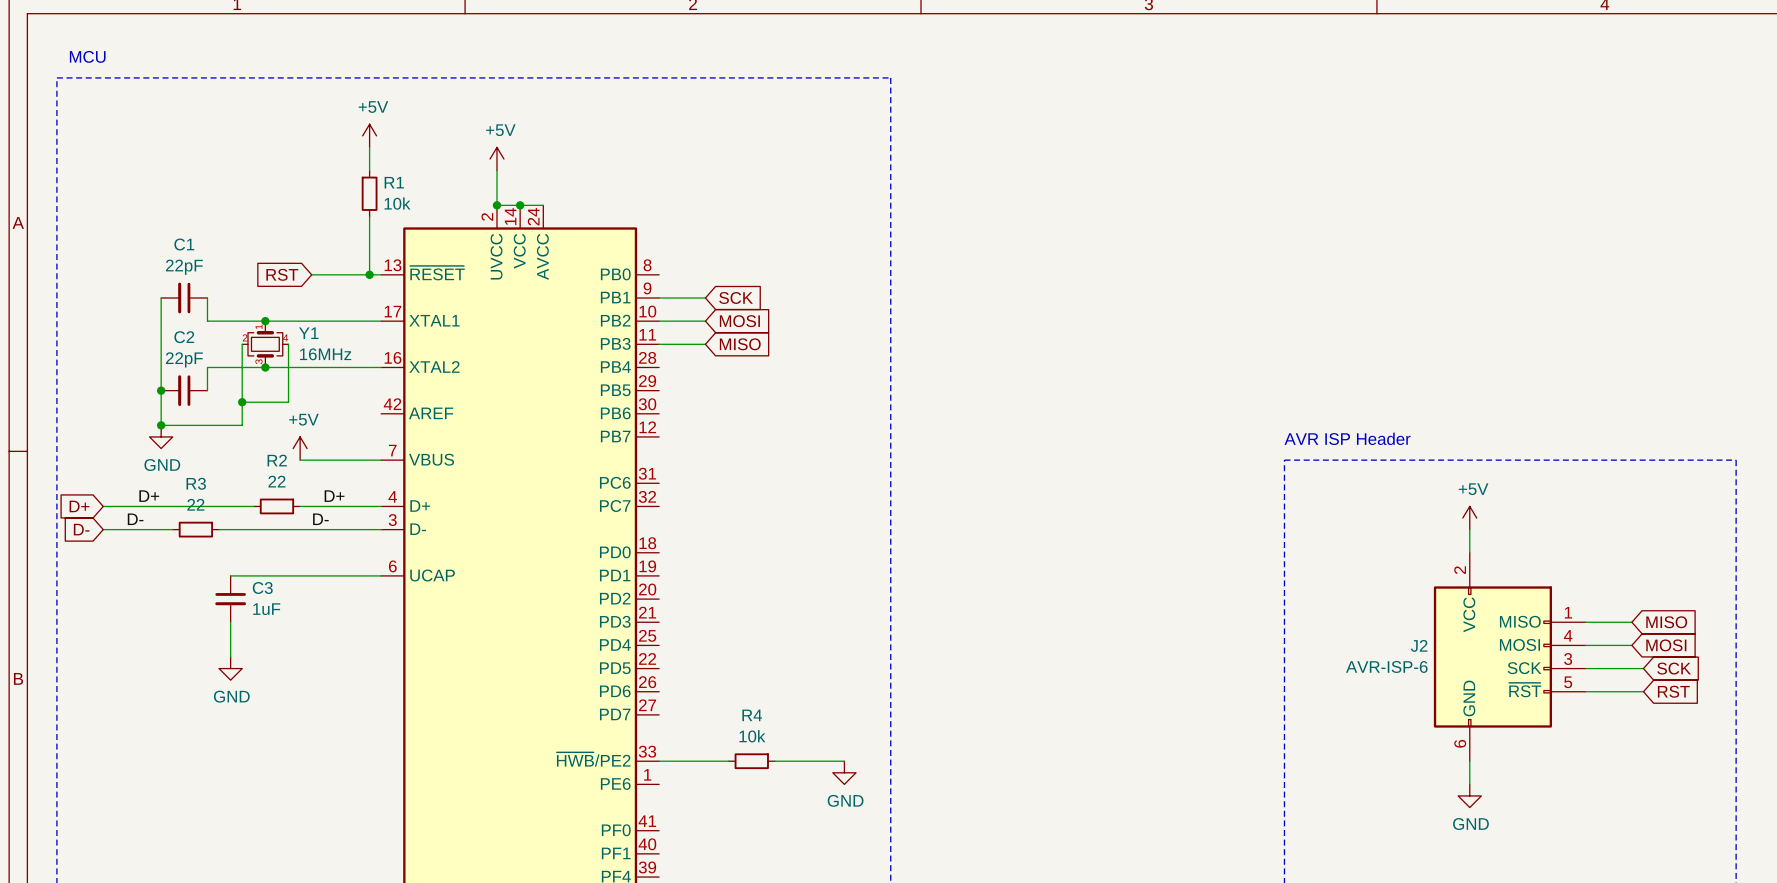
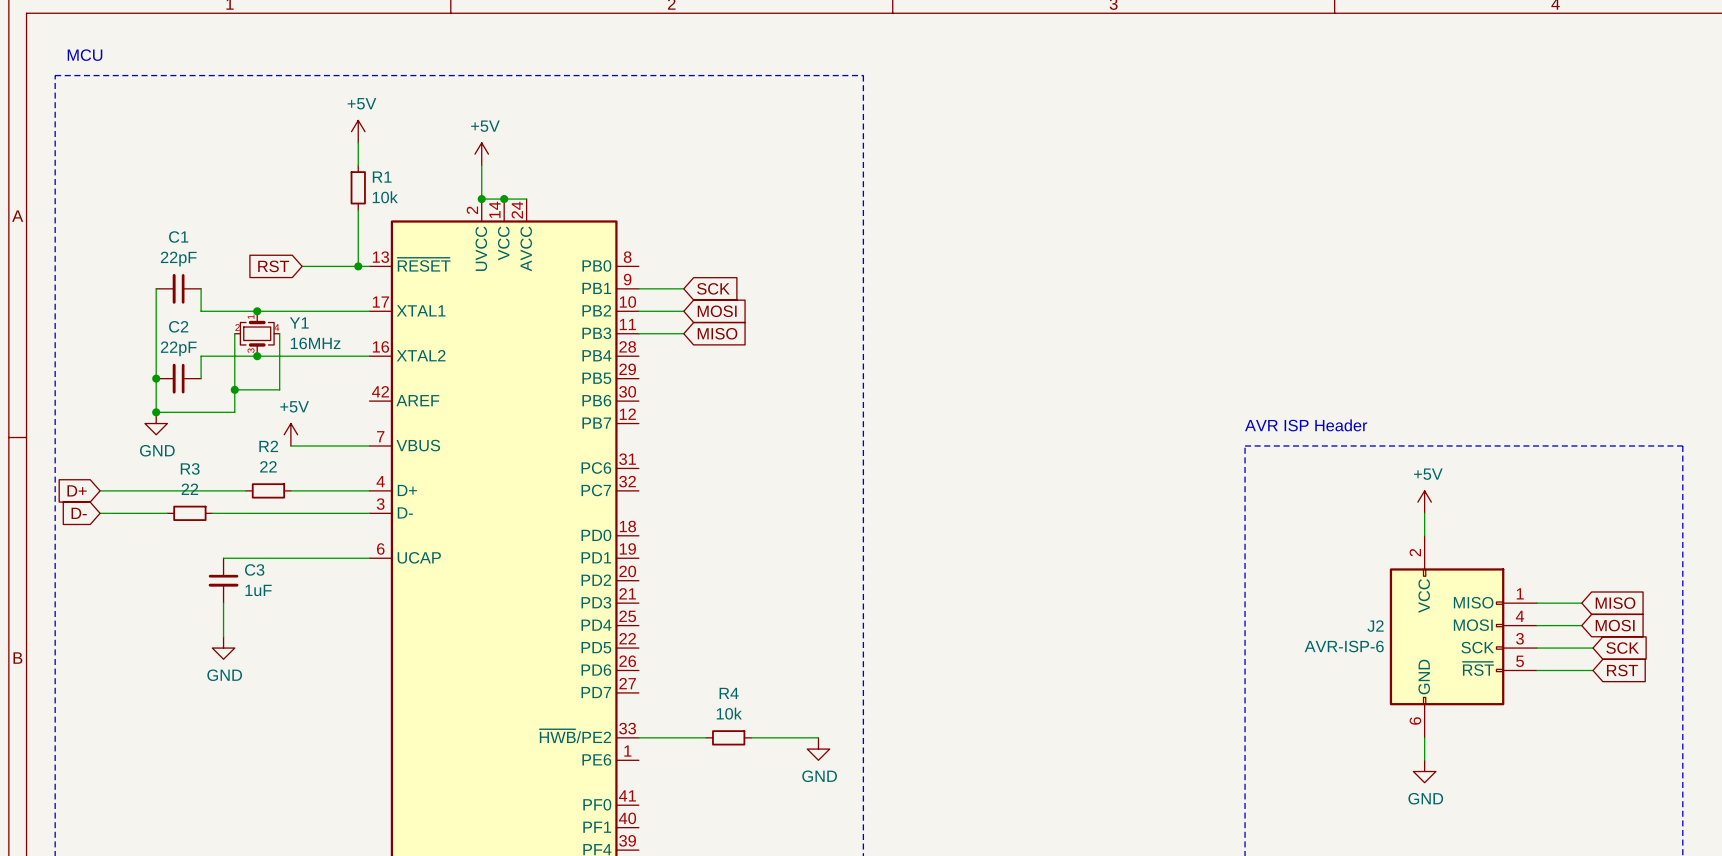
label: D+ (149, 496) -> none
label: D+ (334, 496) -> none
label: D- (135, 519) -> none
label: D- (320, 519) -> none

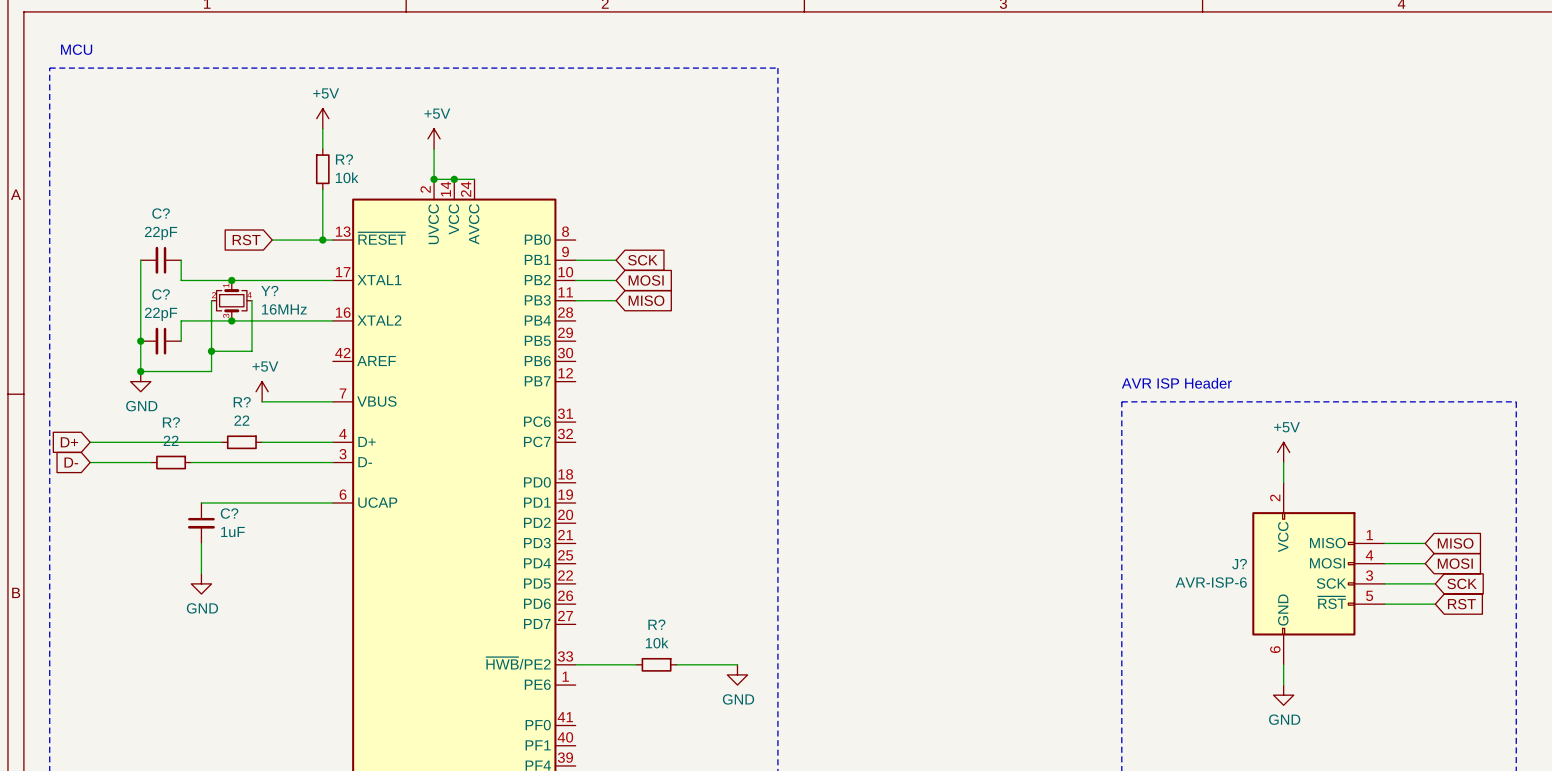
R1 name: R1 (382, 177) -> R? (344, 159)
C1 name: C1 (178, 237) -> C? (161, 213)
Y1 name: Y1 (299, 323) -> Y? (269, 290)
C2 name: C2 (178, 326) -> C? (161, 294)
R2 name: R2 (268, 446) -> R? (242, 402)
R3 name: R3 (190, 468) -> R? (171, 422)
C3 name: C3 (254, 569) -> C? (229, 513)
J2 name: J2 (1375, 626) -> J? (1239, 564)
R4 name: R4 (729, 693) -> R? (656, 624)

